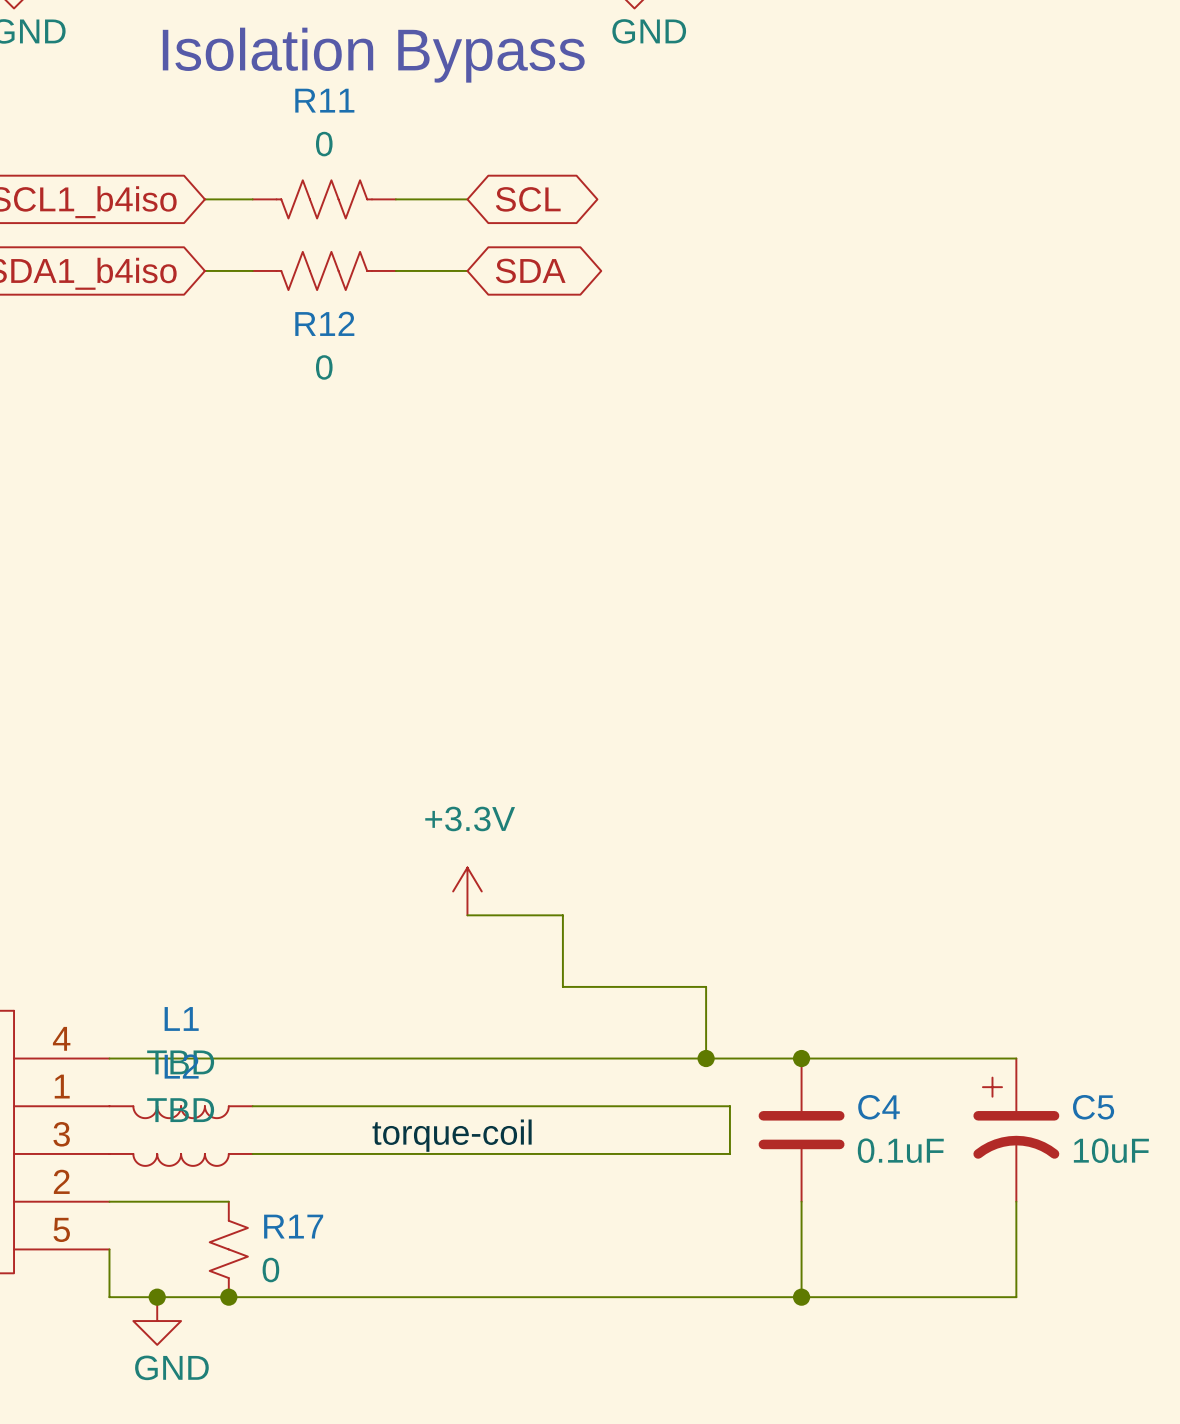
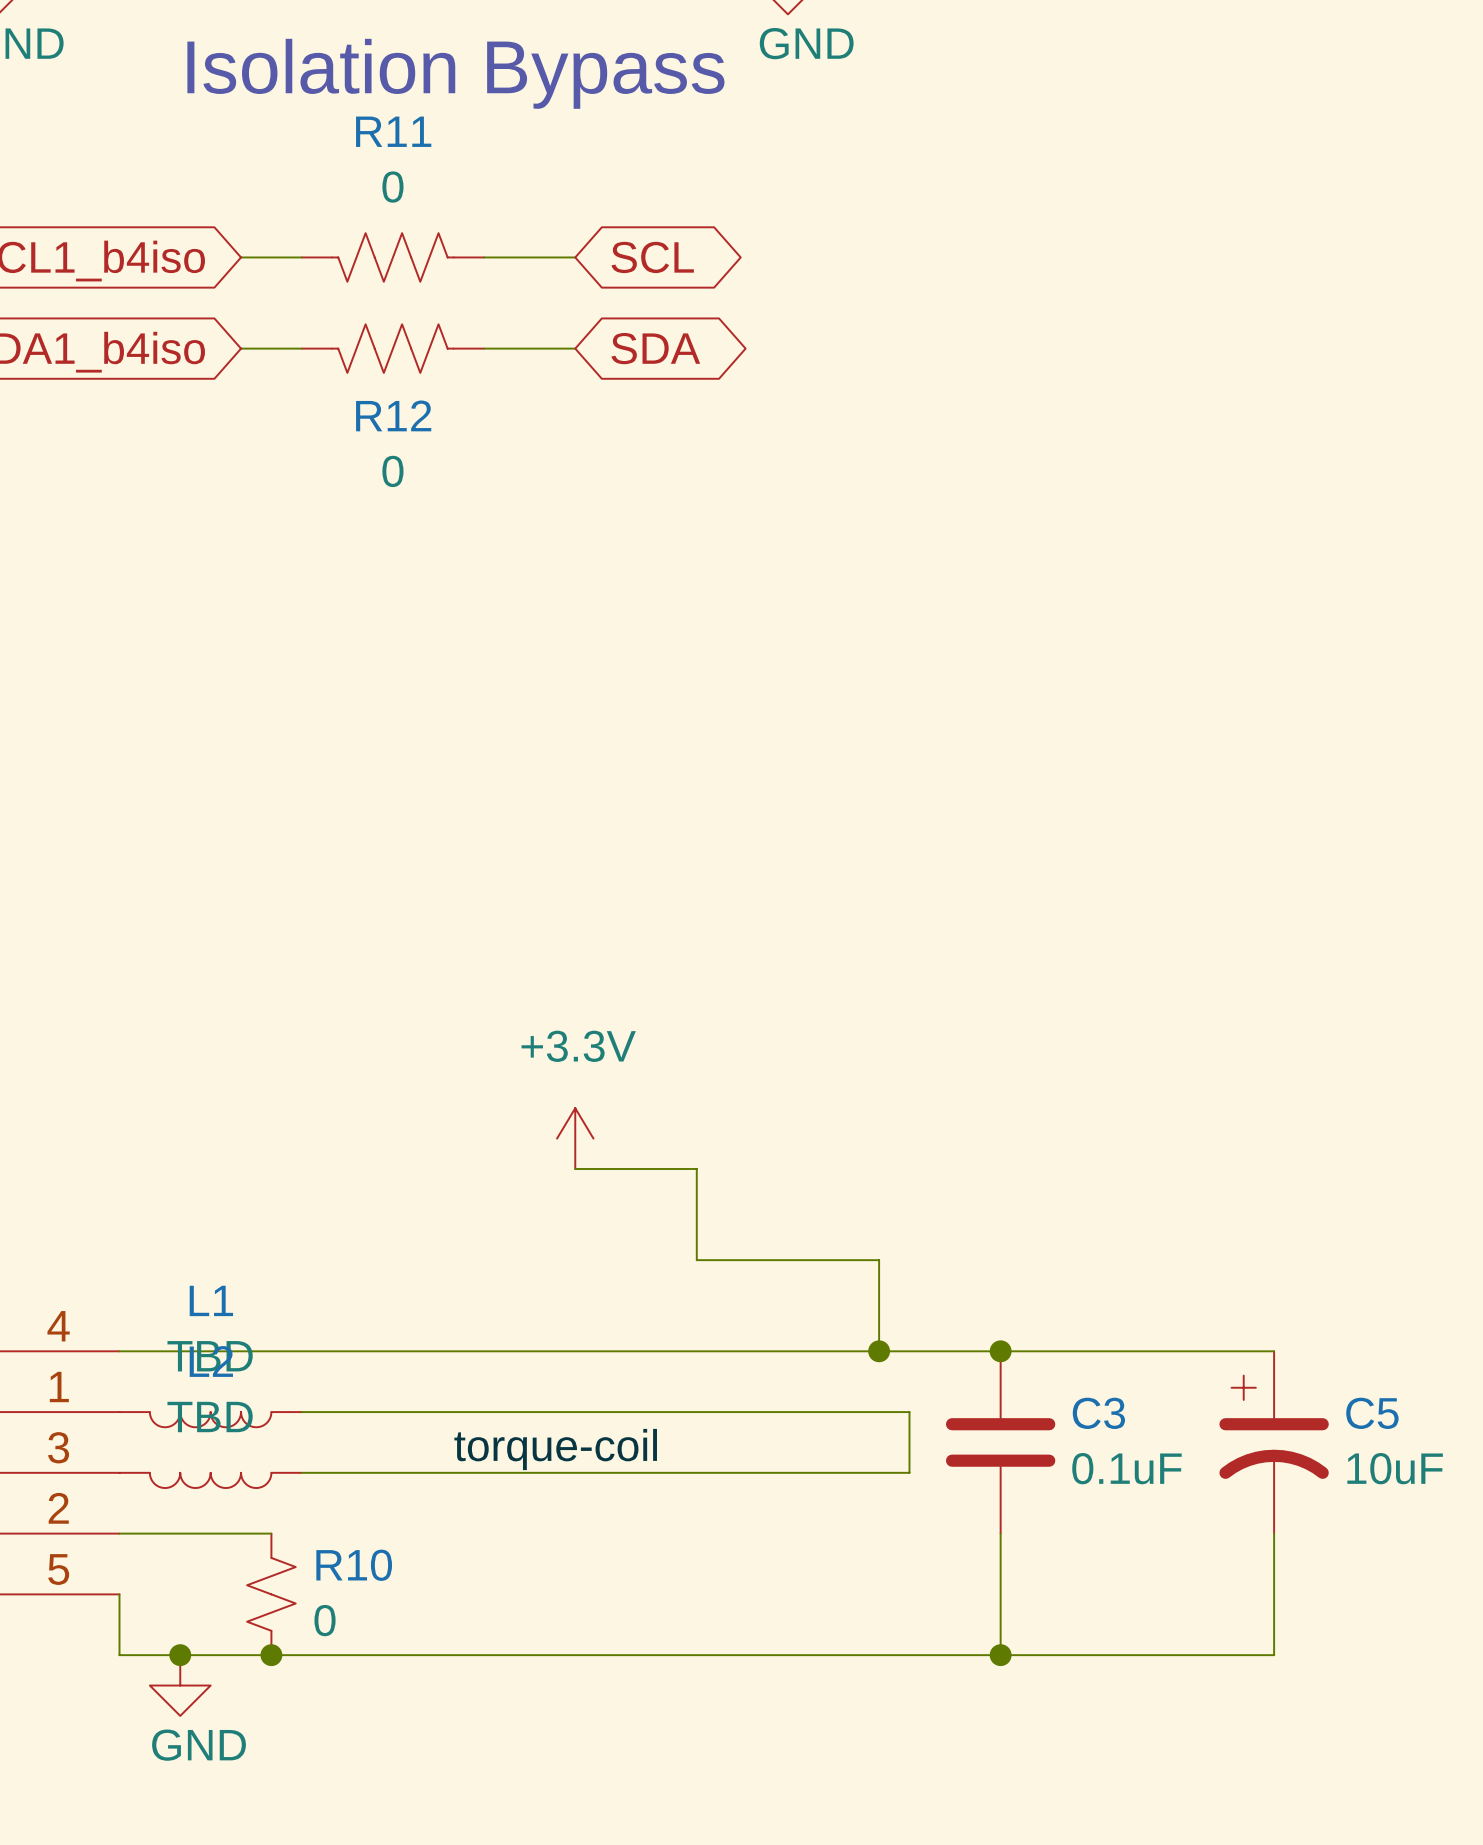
C4 name: C4 (878, 1107) -> C3 (1098, 1413)
R17 name: R17 (293, 1226) -> R10 (354, 1565)

